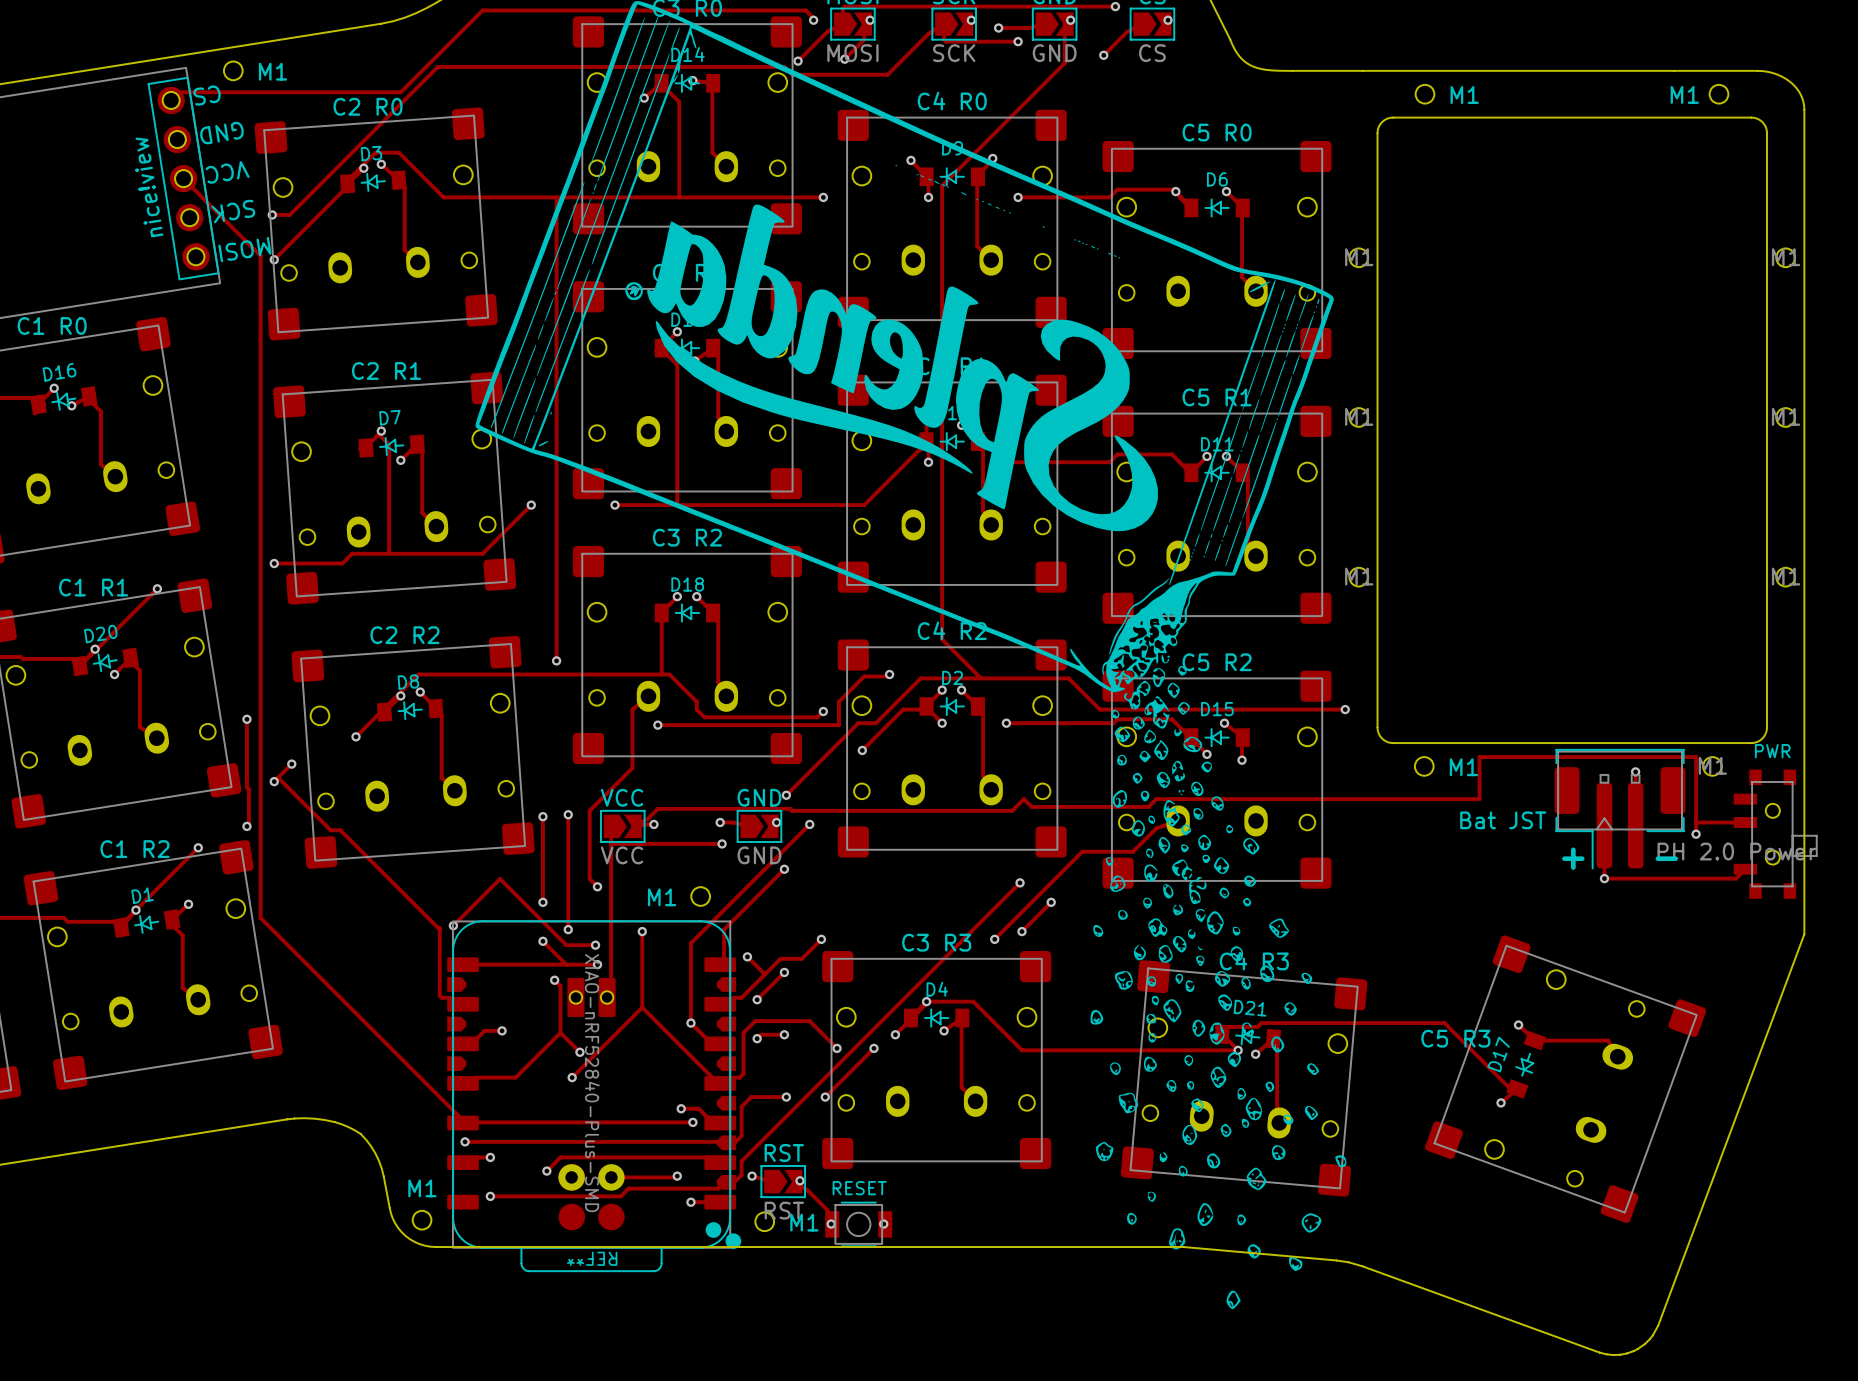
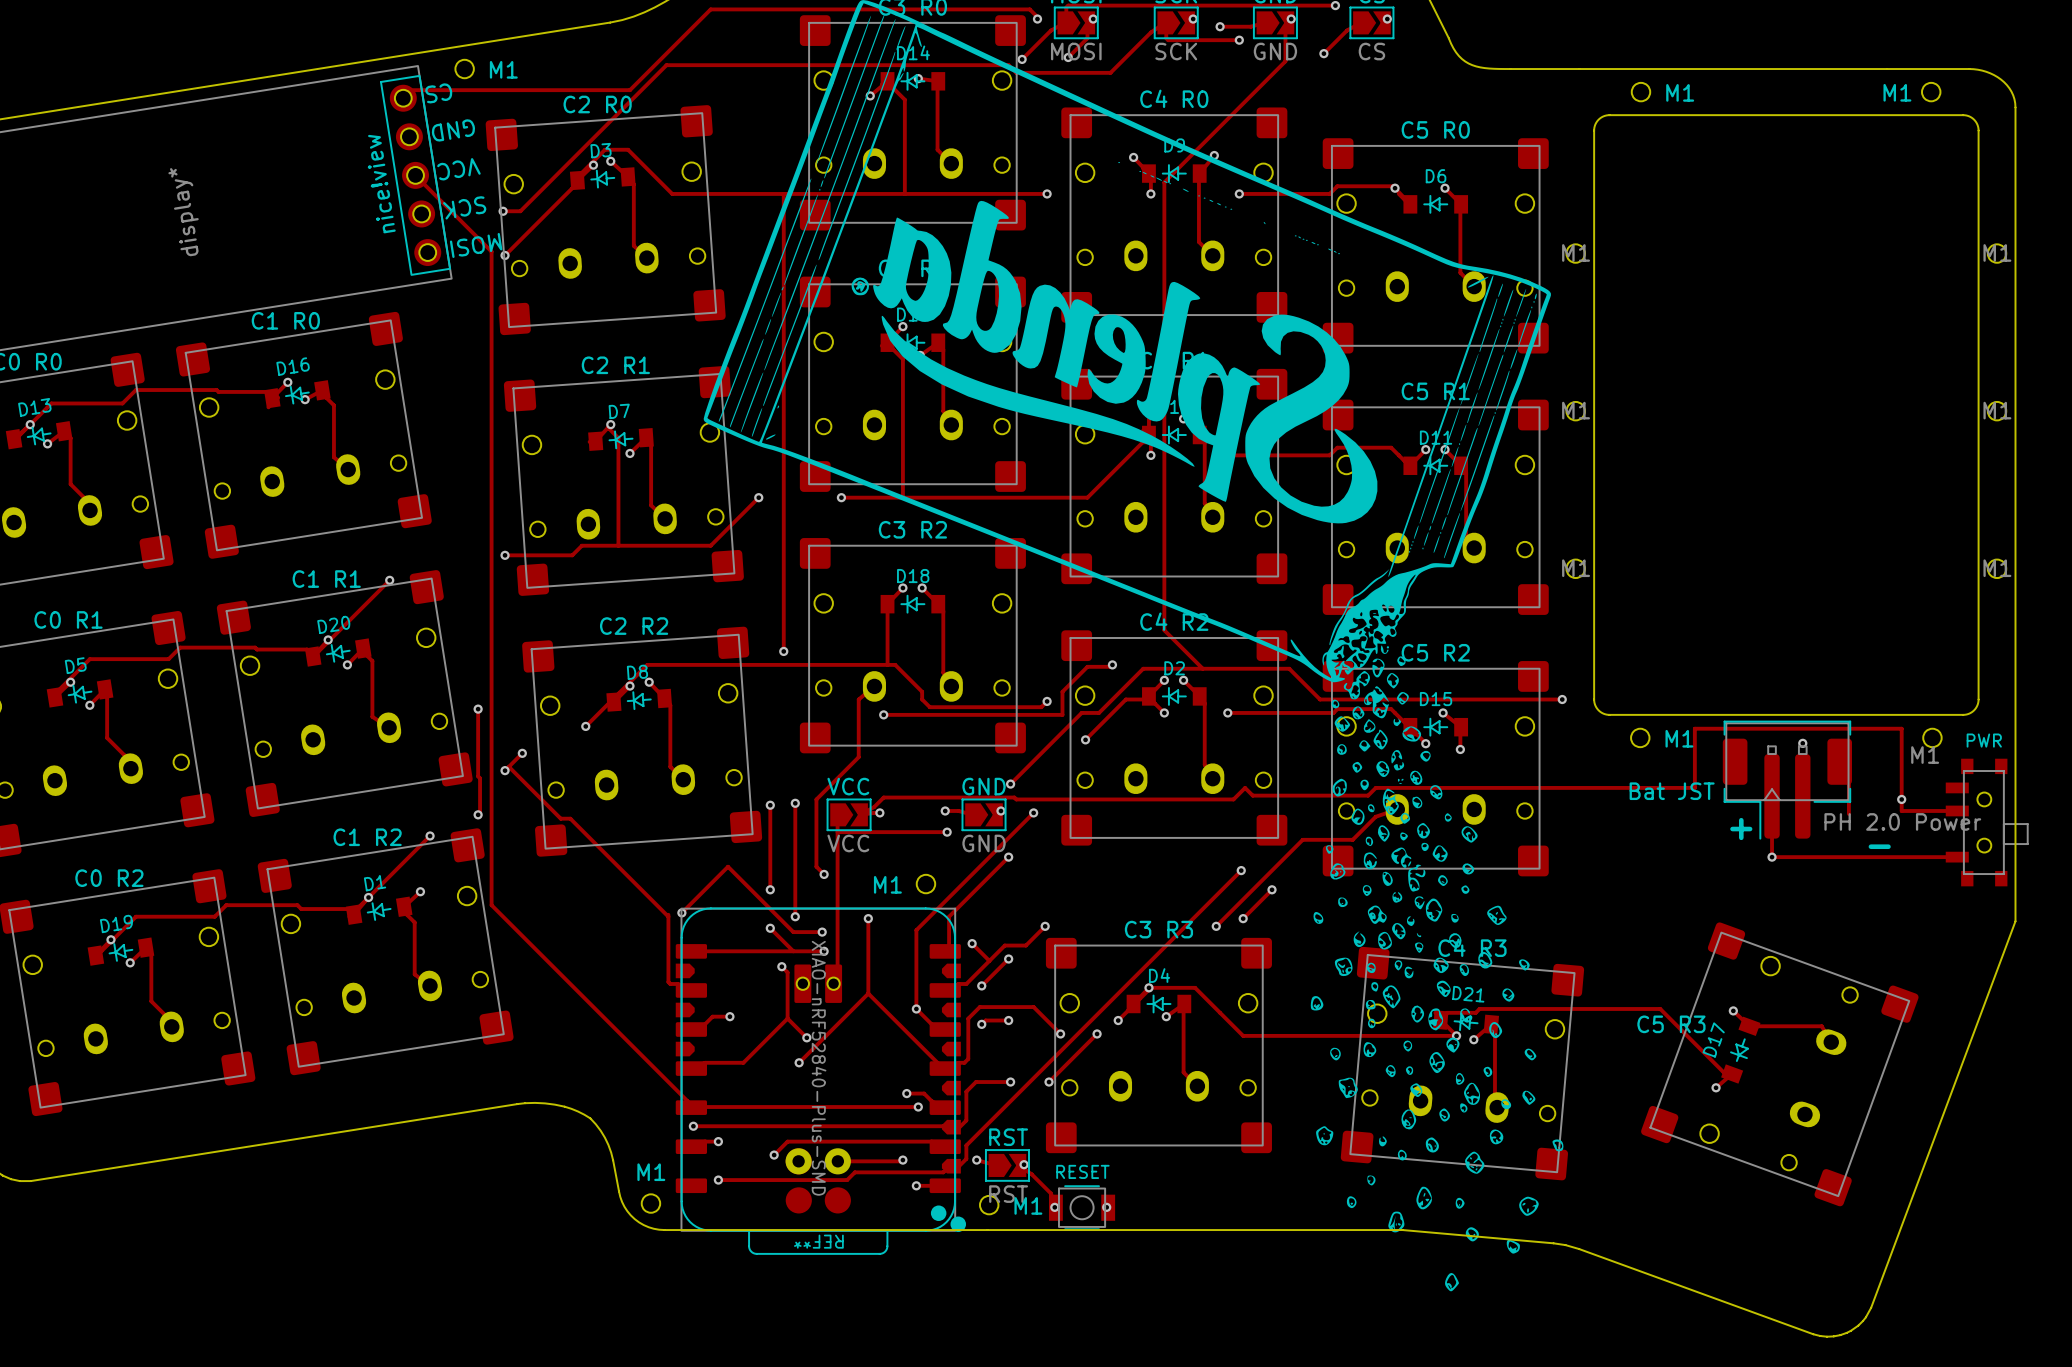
board edge: (1377, 709) (1378, 733) (1384, 740) (1393, 743) (1752, 742) (1760, 740) (1765, 733) (1766, 709) -> (1594, 699) (1598, 710) (1609, 714) (1963, 714) (1974, 710) (1978, 699)
via: none -> (1802, 743)
M1 position: (1424, 766) -> (1640, 737)
M1 position: (1712, 766) -> (1932, 737)
via: (1635, 771) -> none
track: (1479, 799) (1479, 757) (1696, 757) (1696, 834) -> (1694, 787) (1694, 728) (1901, 728) (1901, 810) (1908, 810)
Bat JST position: (1620, 809) -> (1787, 780)
track: (1604, 825) (1604, 878) (1736, 878) (1745, 869) -> (1772, 796) (1772, 857) (1957, 857)
via position: (1696, 834) -> (1901, 799)
text position: + (1573, 858) -> + (1741, 829)
via position: (1604, 878) -> (1772, 857)

